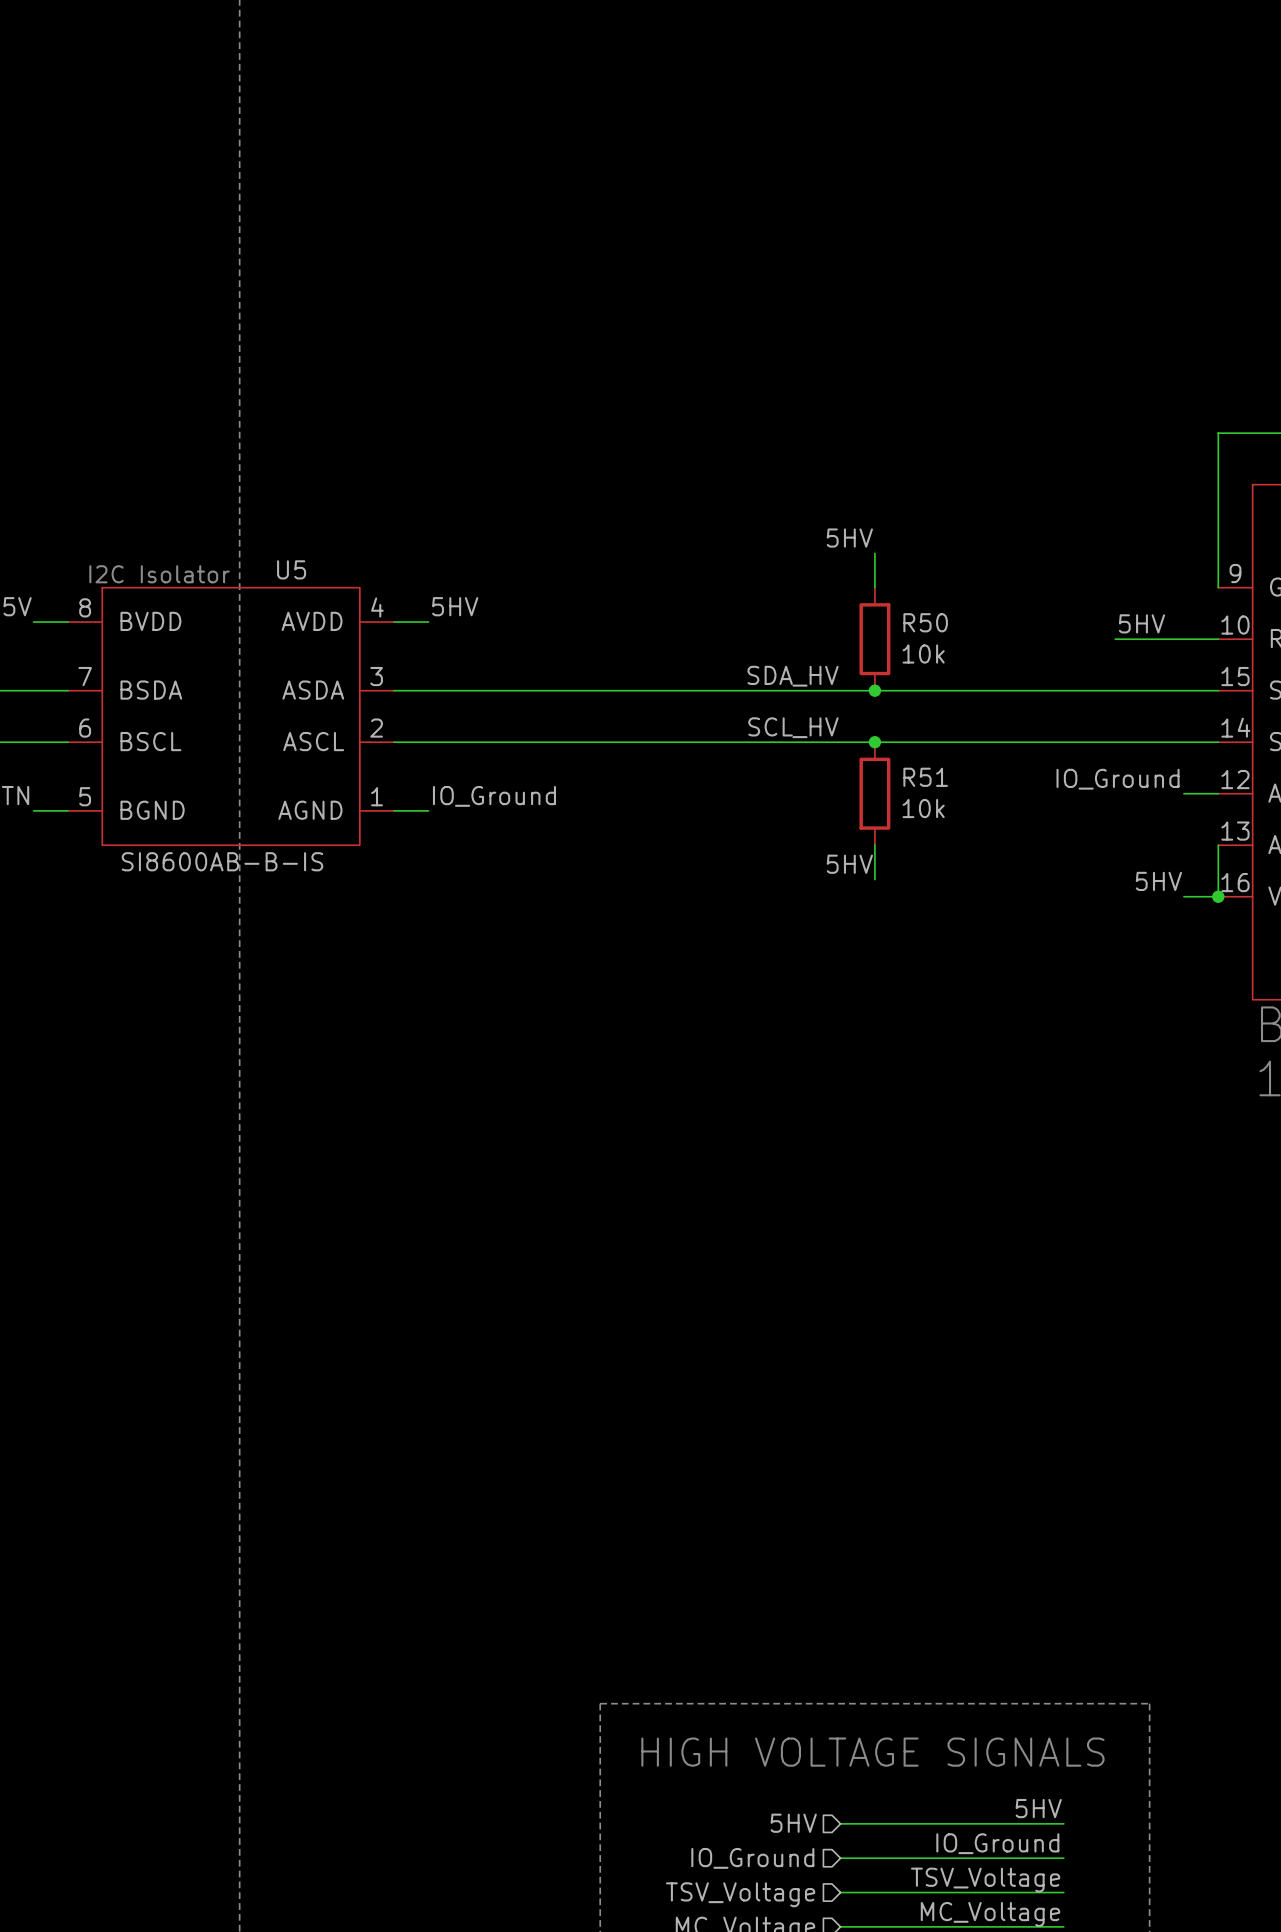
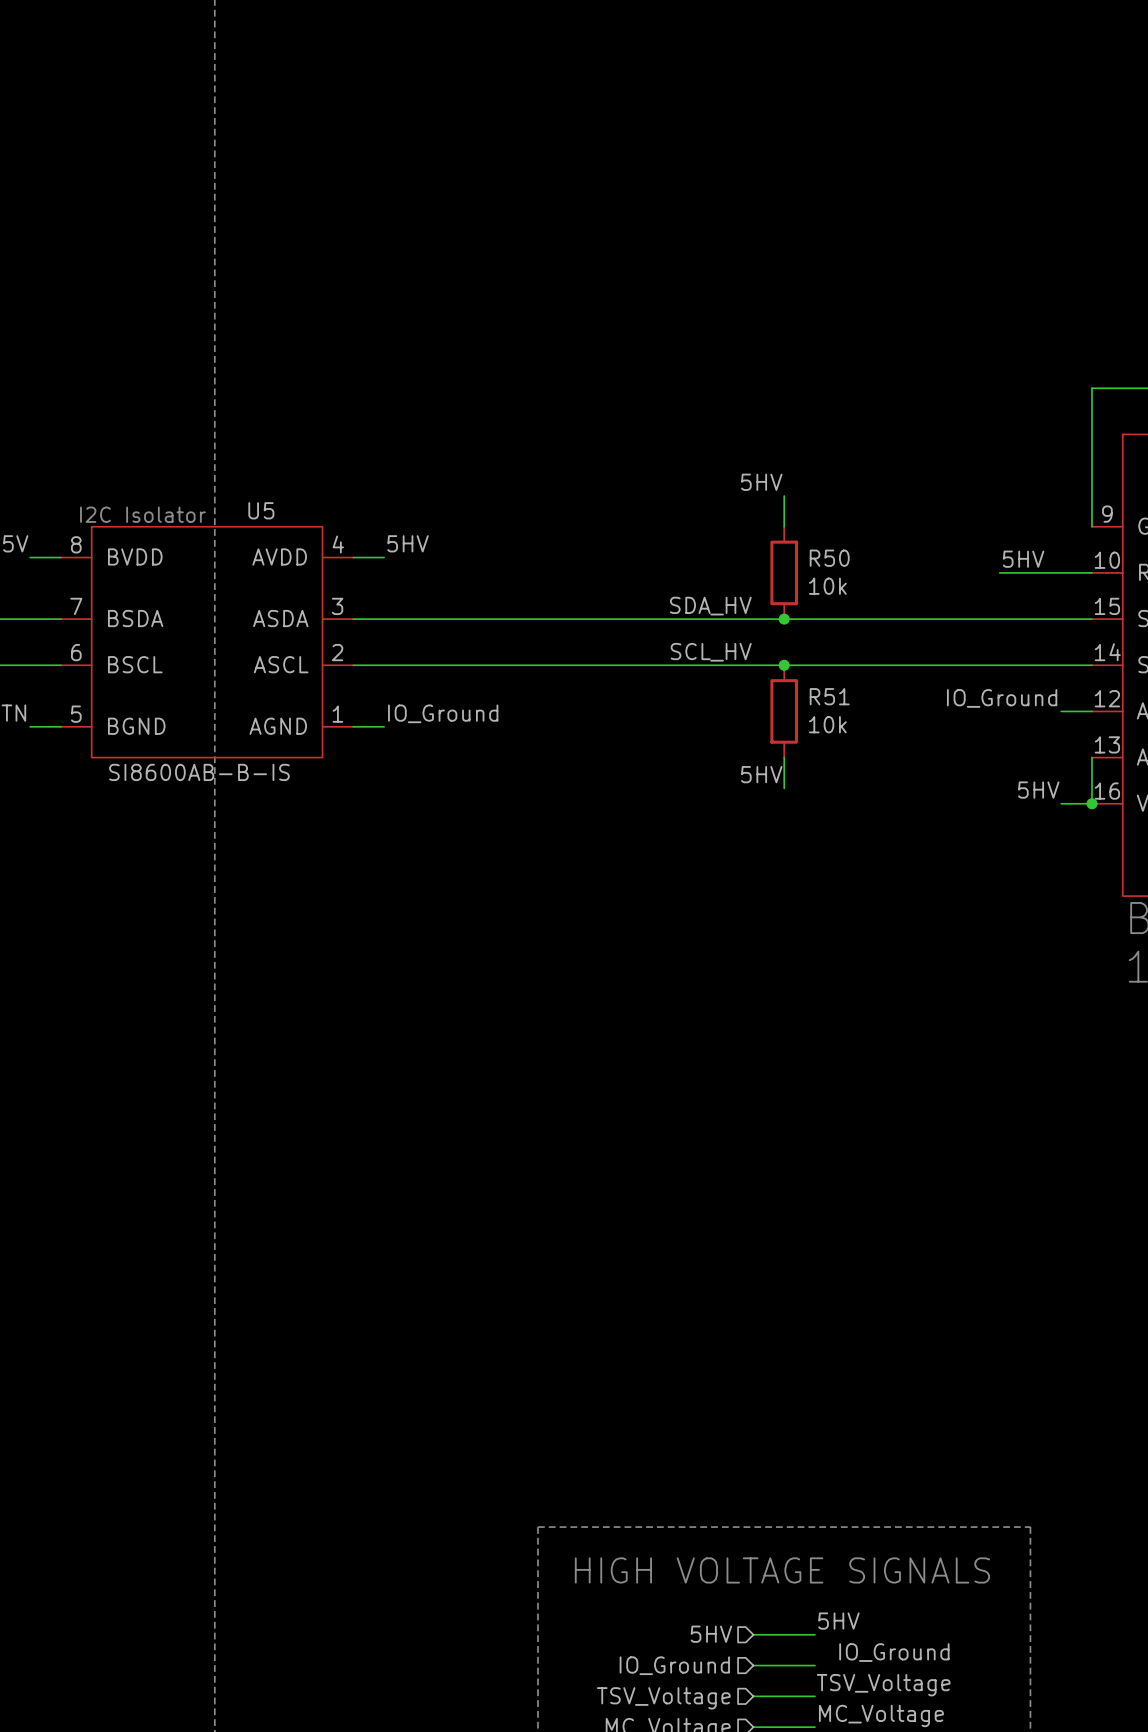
label position: 5HV (1038, 1808) -> 5HV (838, 1621)
wire: (909, 1823) (1063, 1823) -> none
wire: (909, 1858) (1063, 1858) -> none
label position: TSV_Voltage (985, 1880) -> TSV_Voltage (883, 1685)
wire: (909, 1892) (1063, 1892) -> none
label position: MC_Voltage (990, 1914) -> MC_Voltage (881, 1715)
wire: (909, 1926) (1063, 1926) -> none

